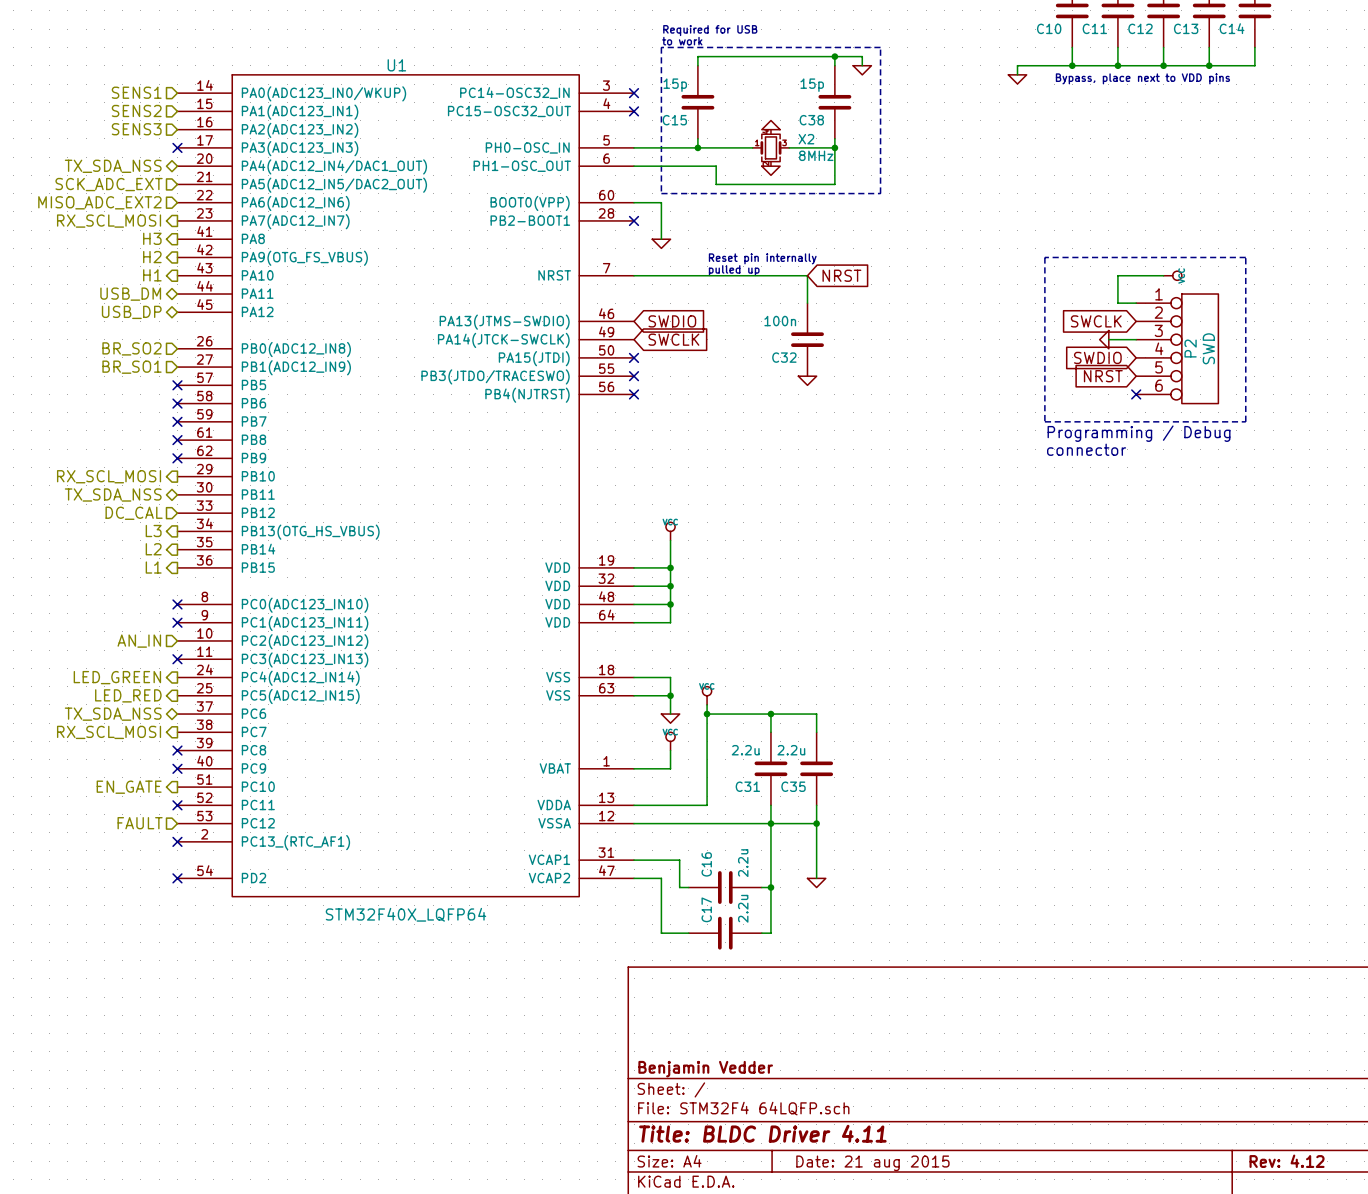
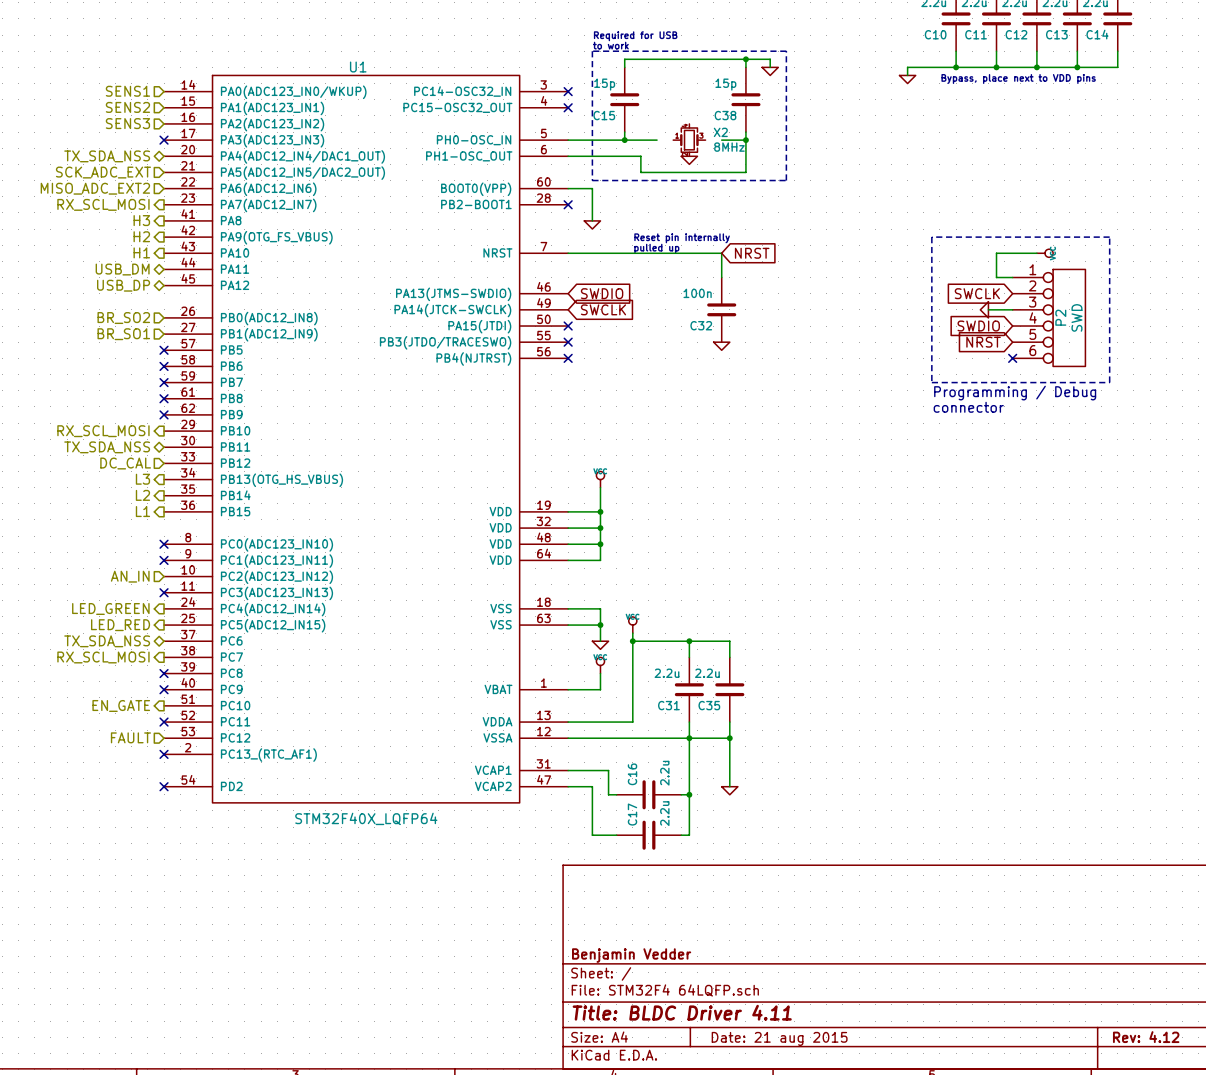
power symbol: (770, 125) -> none
wire: (734, 147) (752, 147) -> none
wire: (789, 147) (807, 147) -> none

